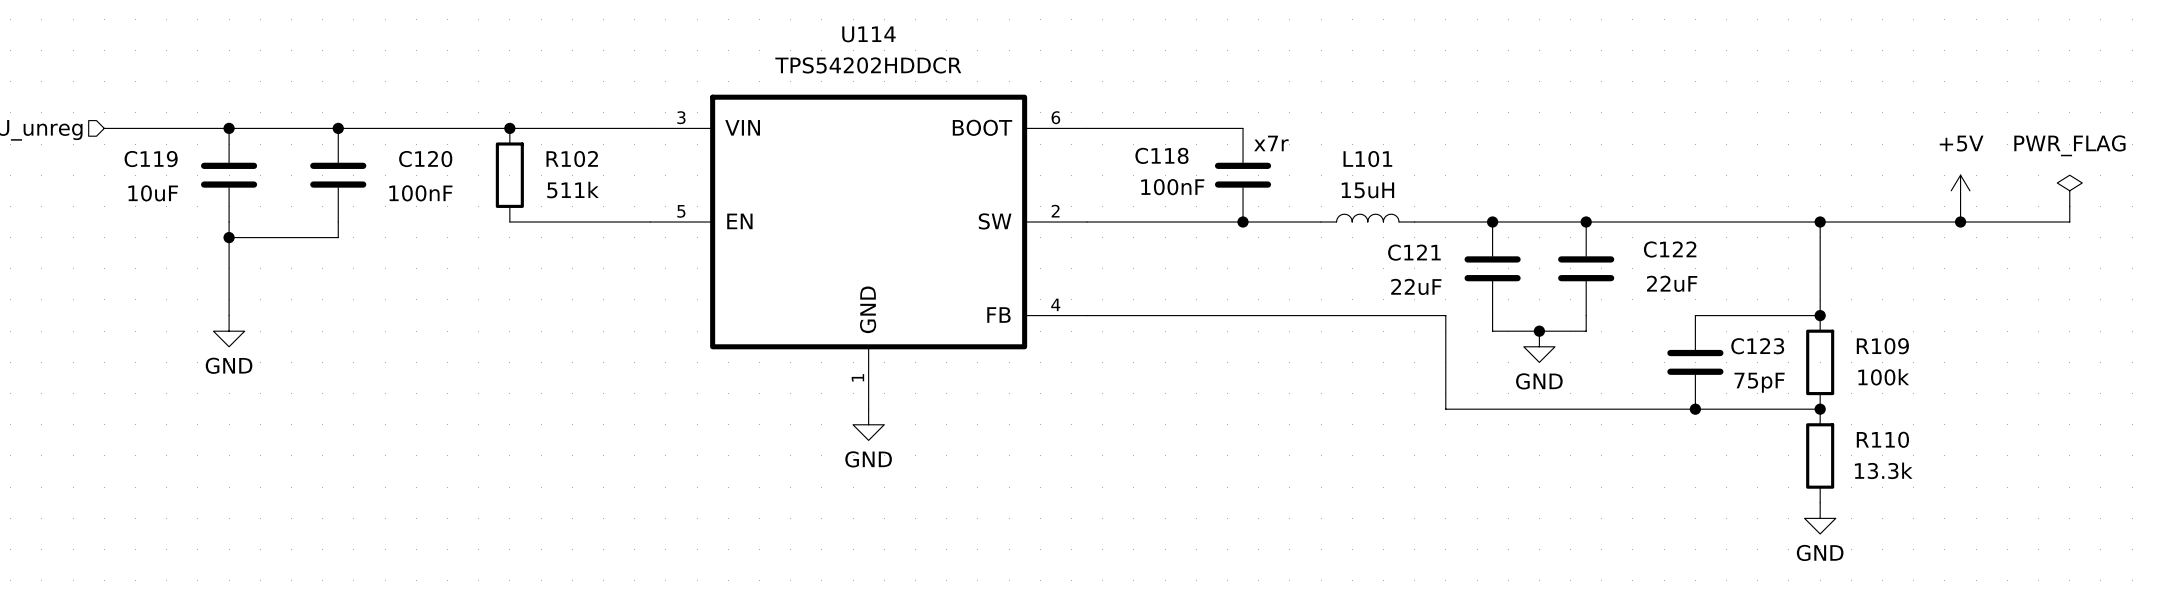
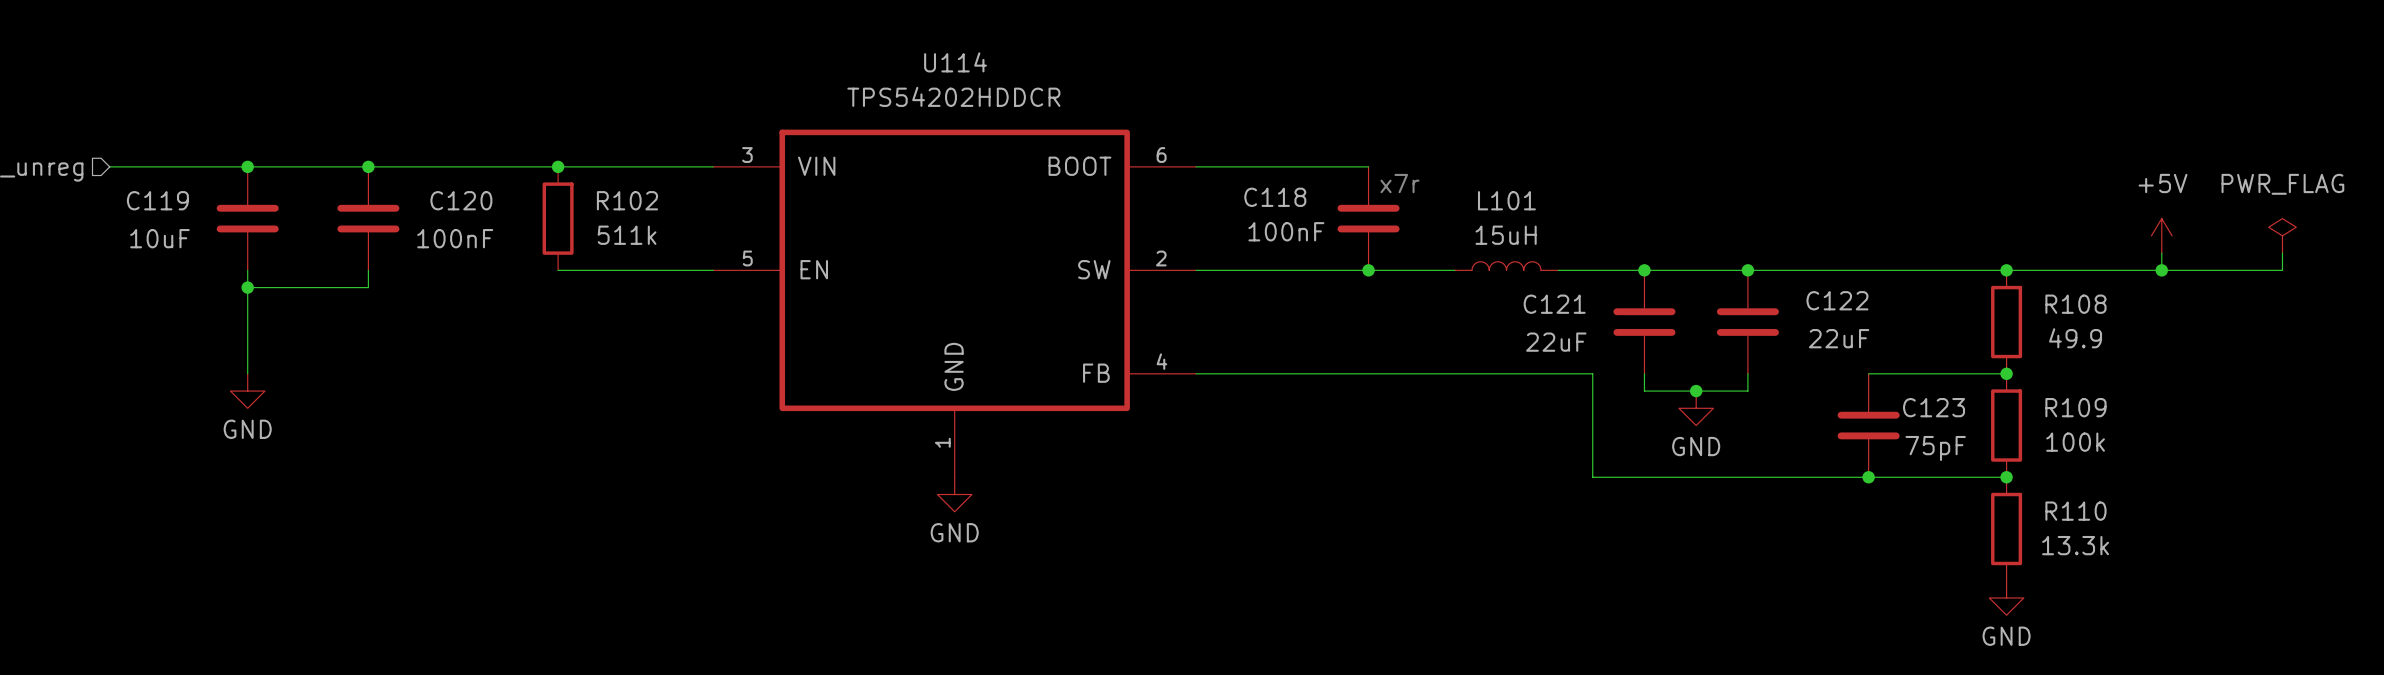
wire: (1820, 222) (1820, 315) -> none
R108: none -> 49.9 (2006, 322)

